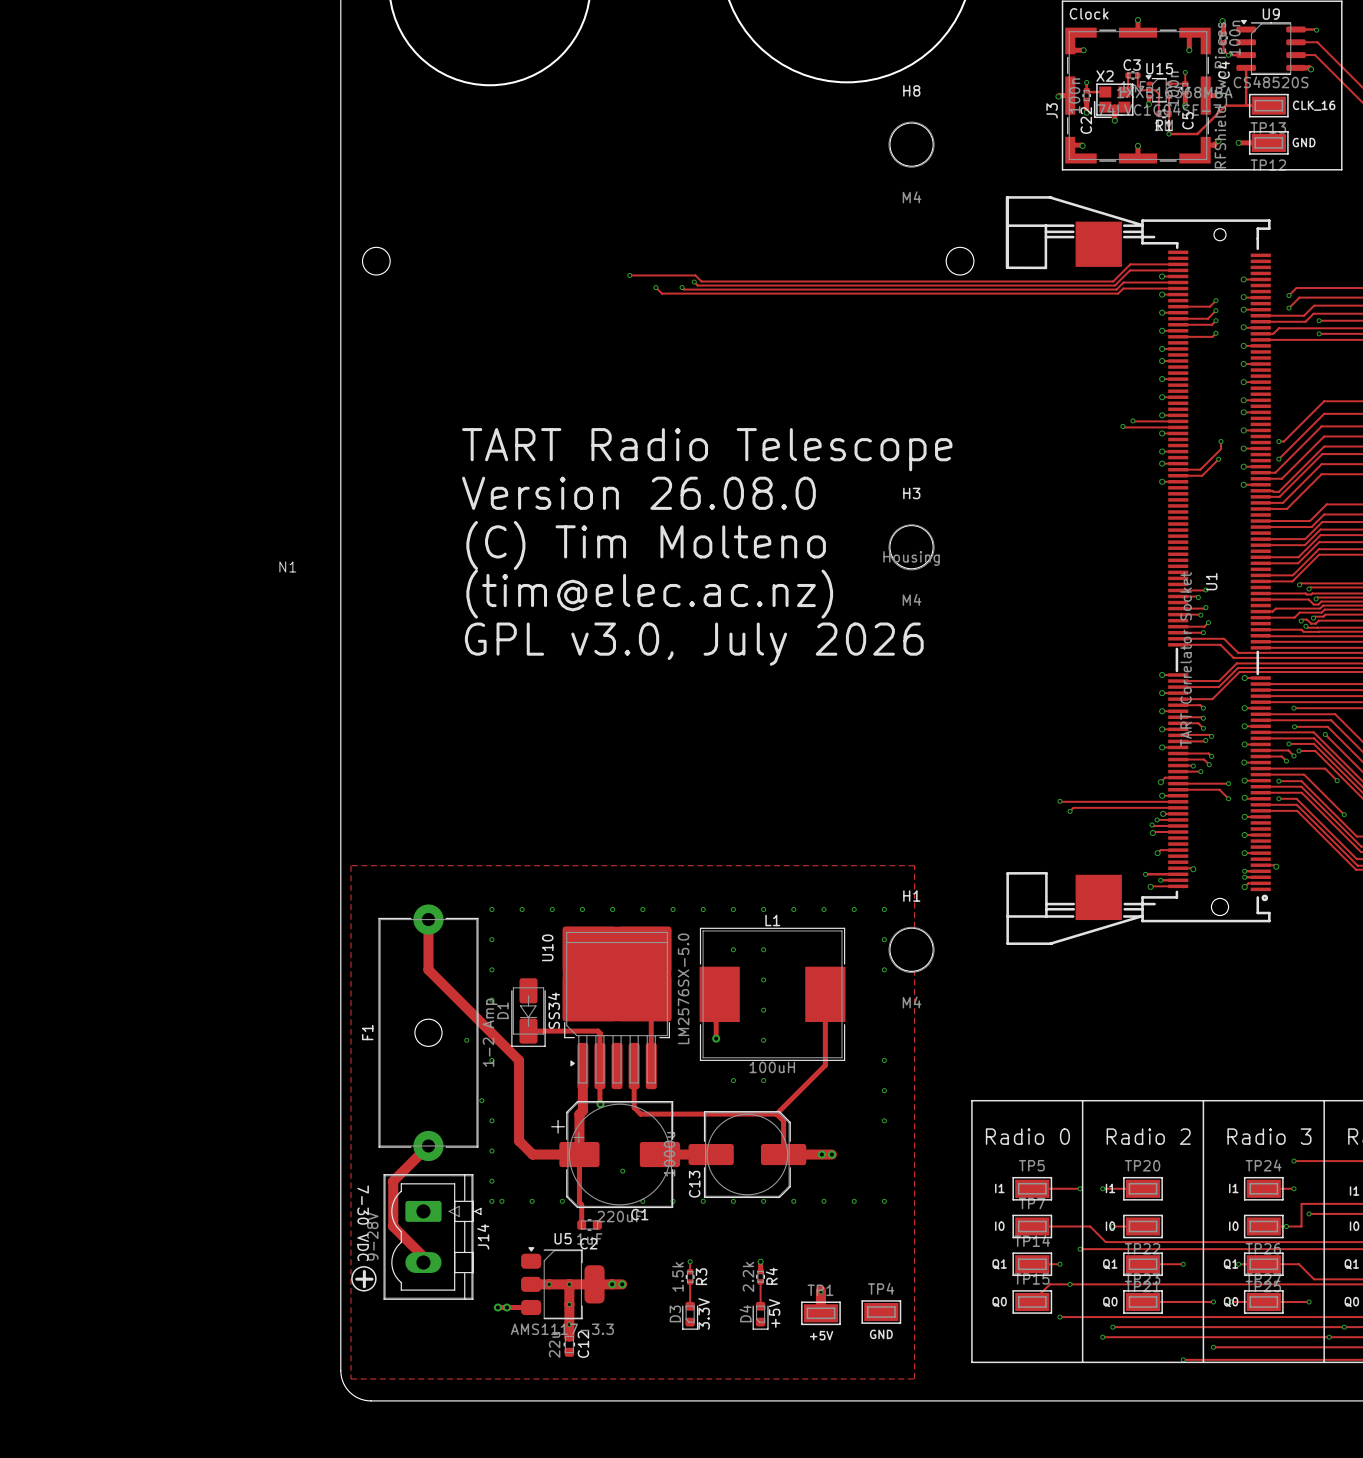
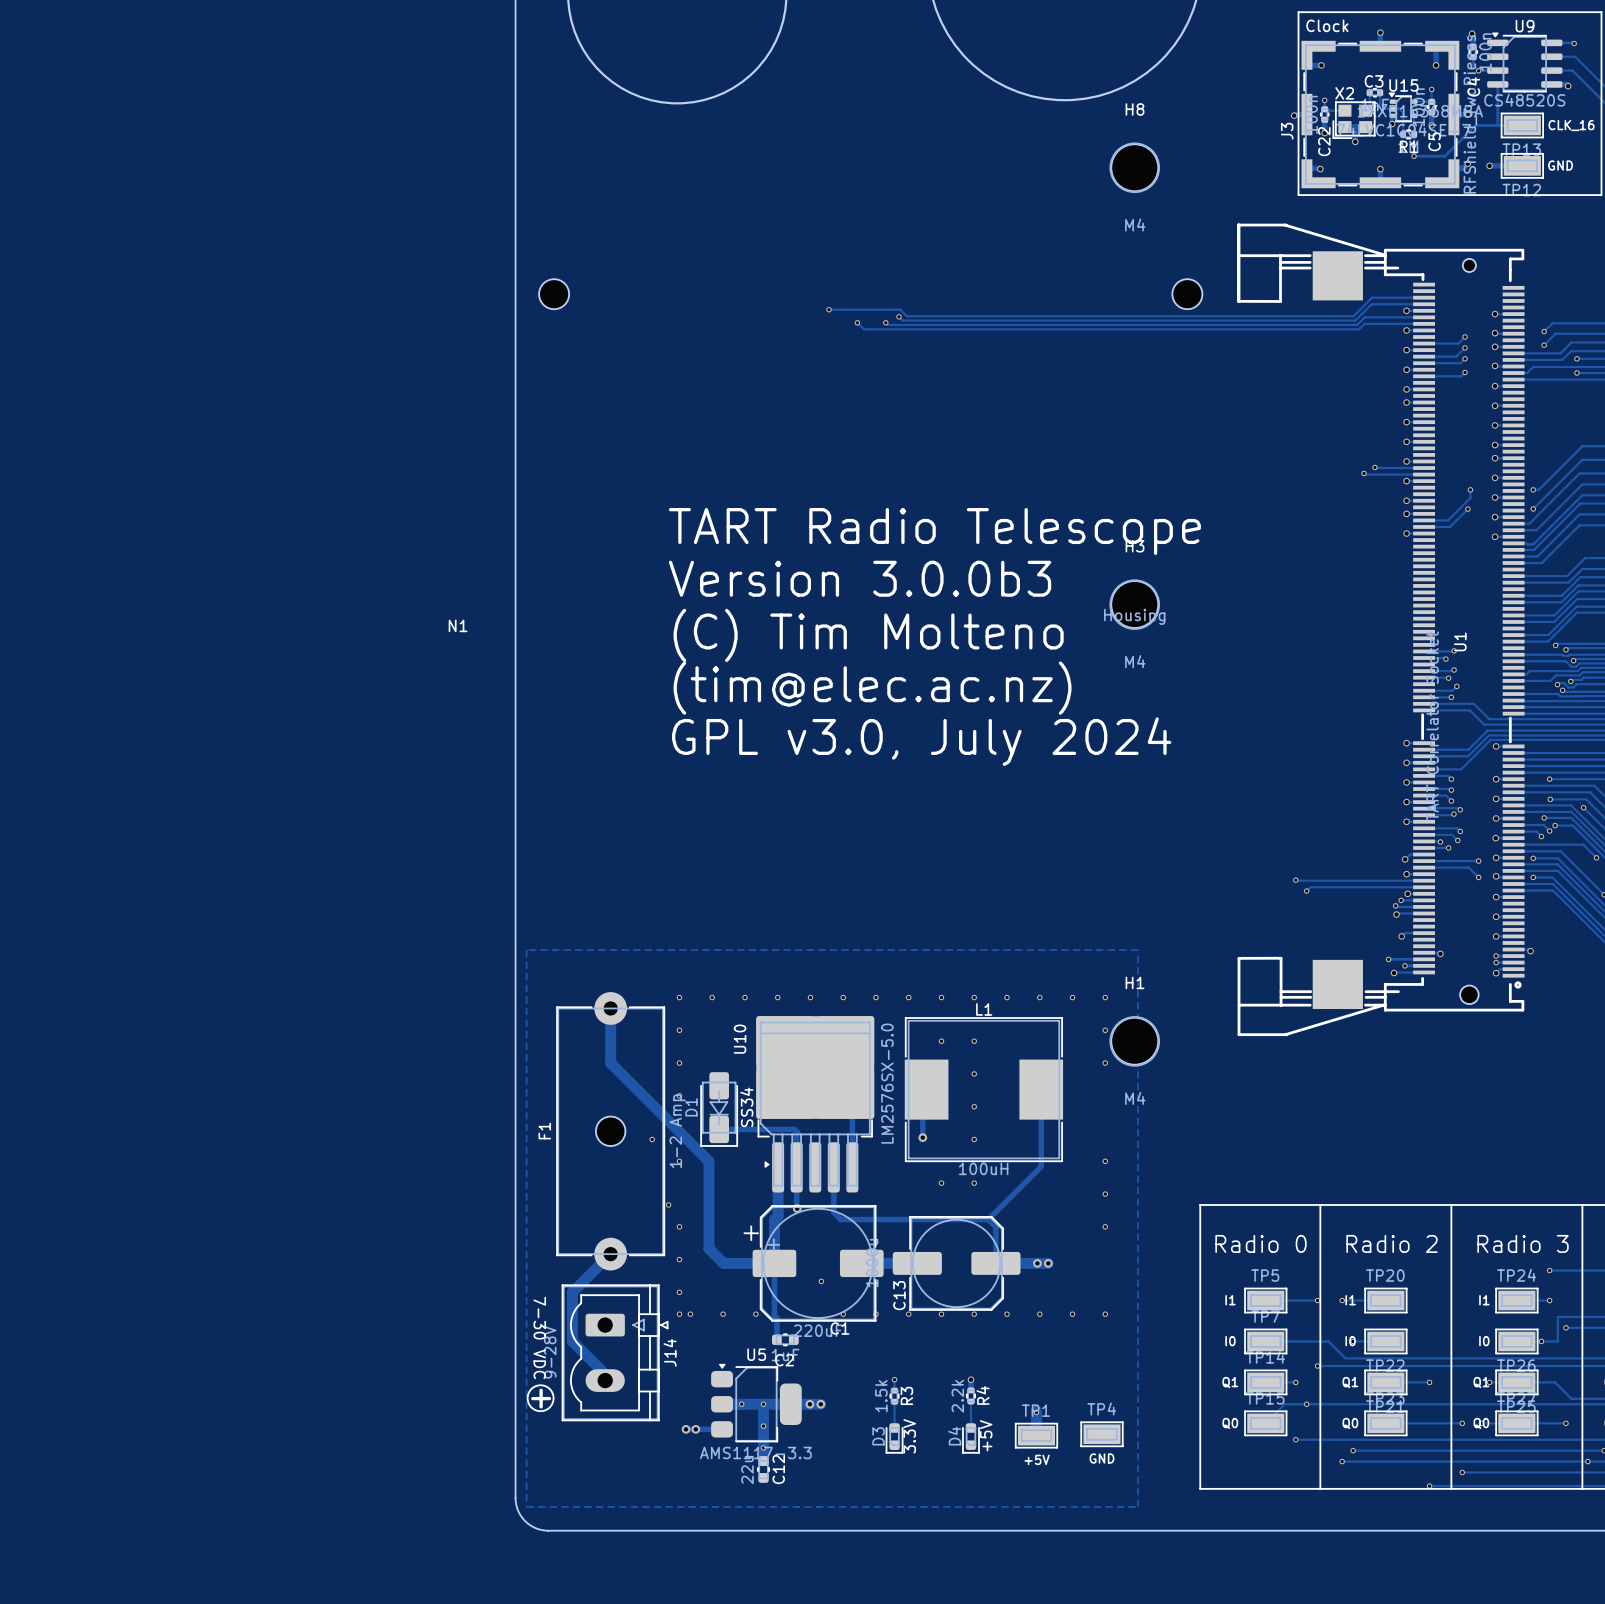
text position: TART Radio Telescope (707, 449) -> TART Radio Telescope (934, 531)
text: Version 26.08.0 (638, 493) -> Version 3.0.0b3 (860, 578)
text position: (C) Tim Molteno (646, 545) -> (C) Tim Molteno (868, 635)
text position: (tim@elec.ac.nz) (649, 594) -> (tim@elec.ac.nz) (872, 688)
text: GPL v3.0, July 2026 (694, 644) -> GPL v3.0, July 2024 (921, 741)

